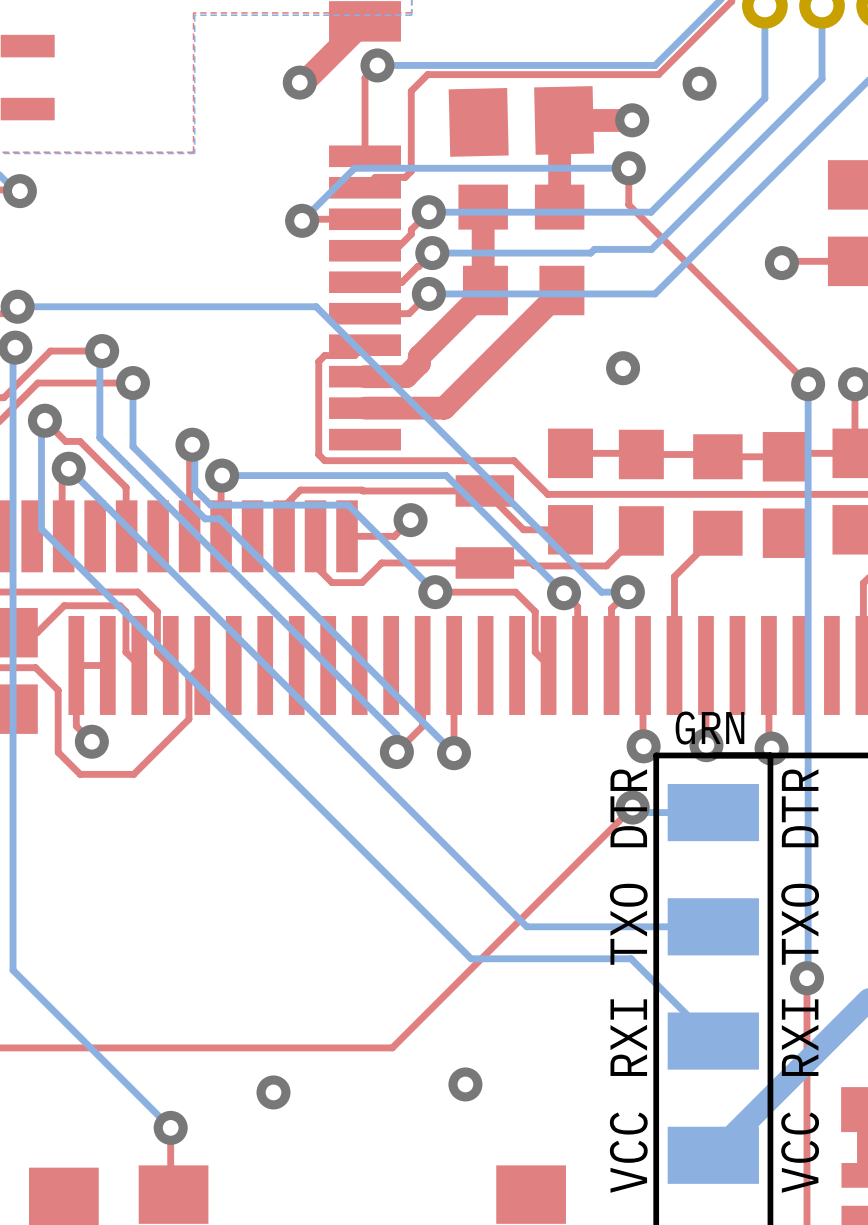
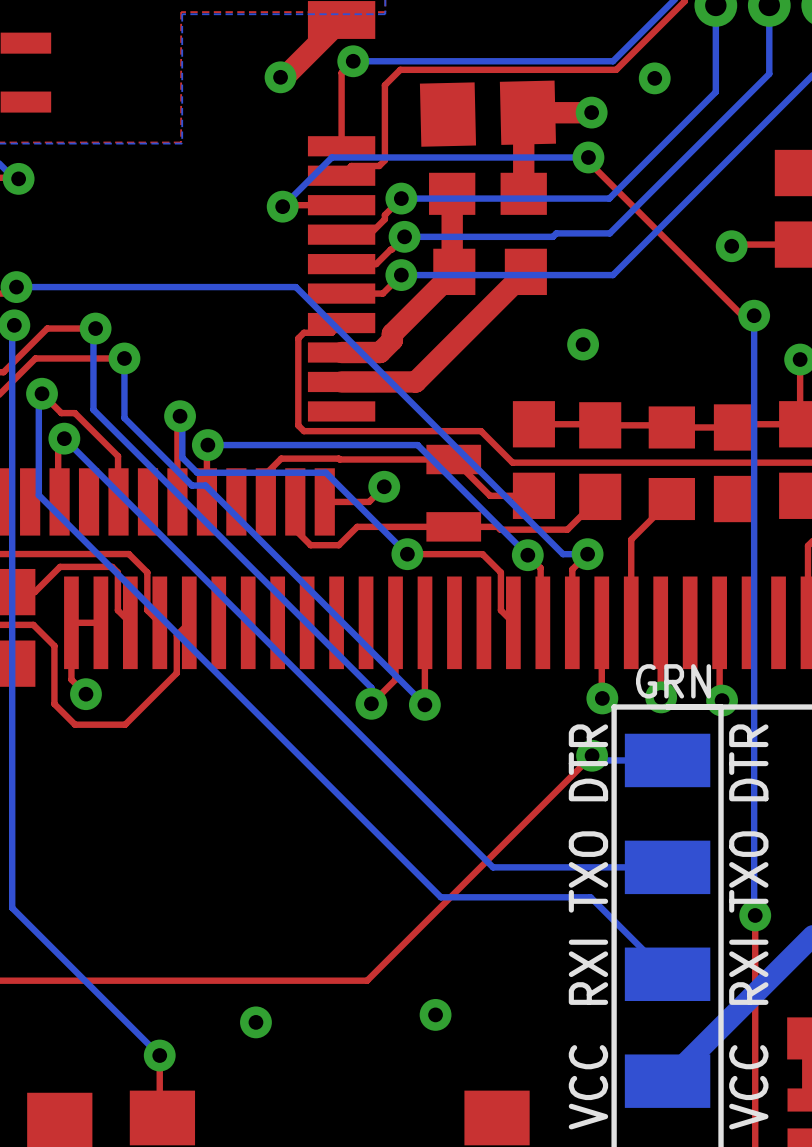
top track: (628, 172) (628, 204) (808, 384) -> (588, 161) (742, 315) (754, 315)
bottom track: (808, 384) (806, 978) -> (754, 315) (755, 915)
via position: (808, 384) -> (754, 315)

